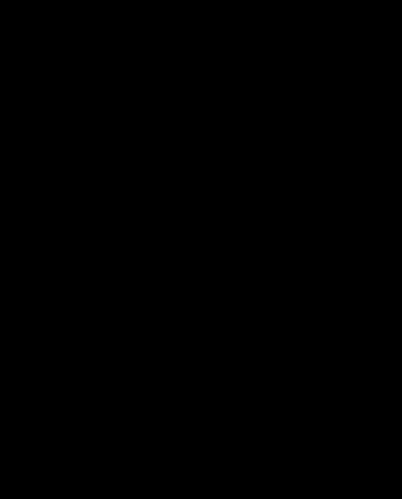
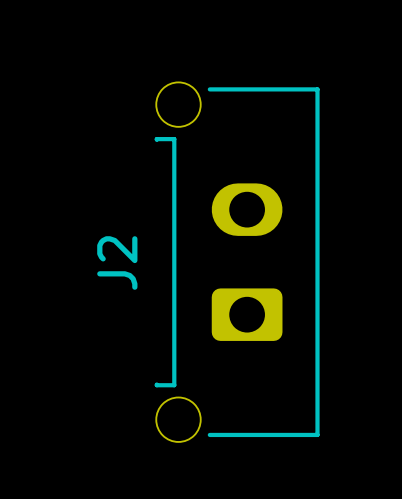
J2: none -> (237, 262)

